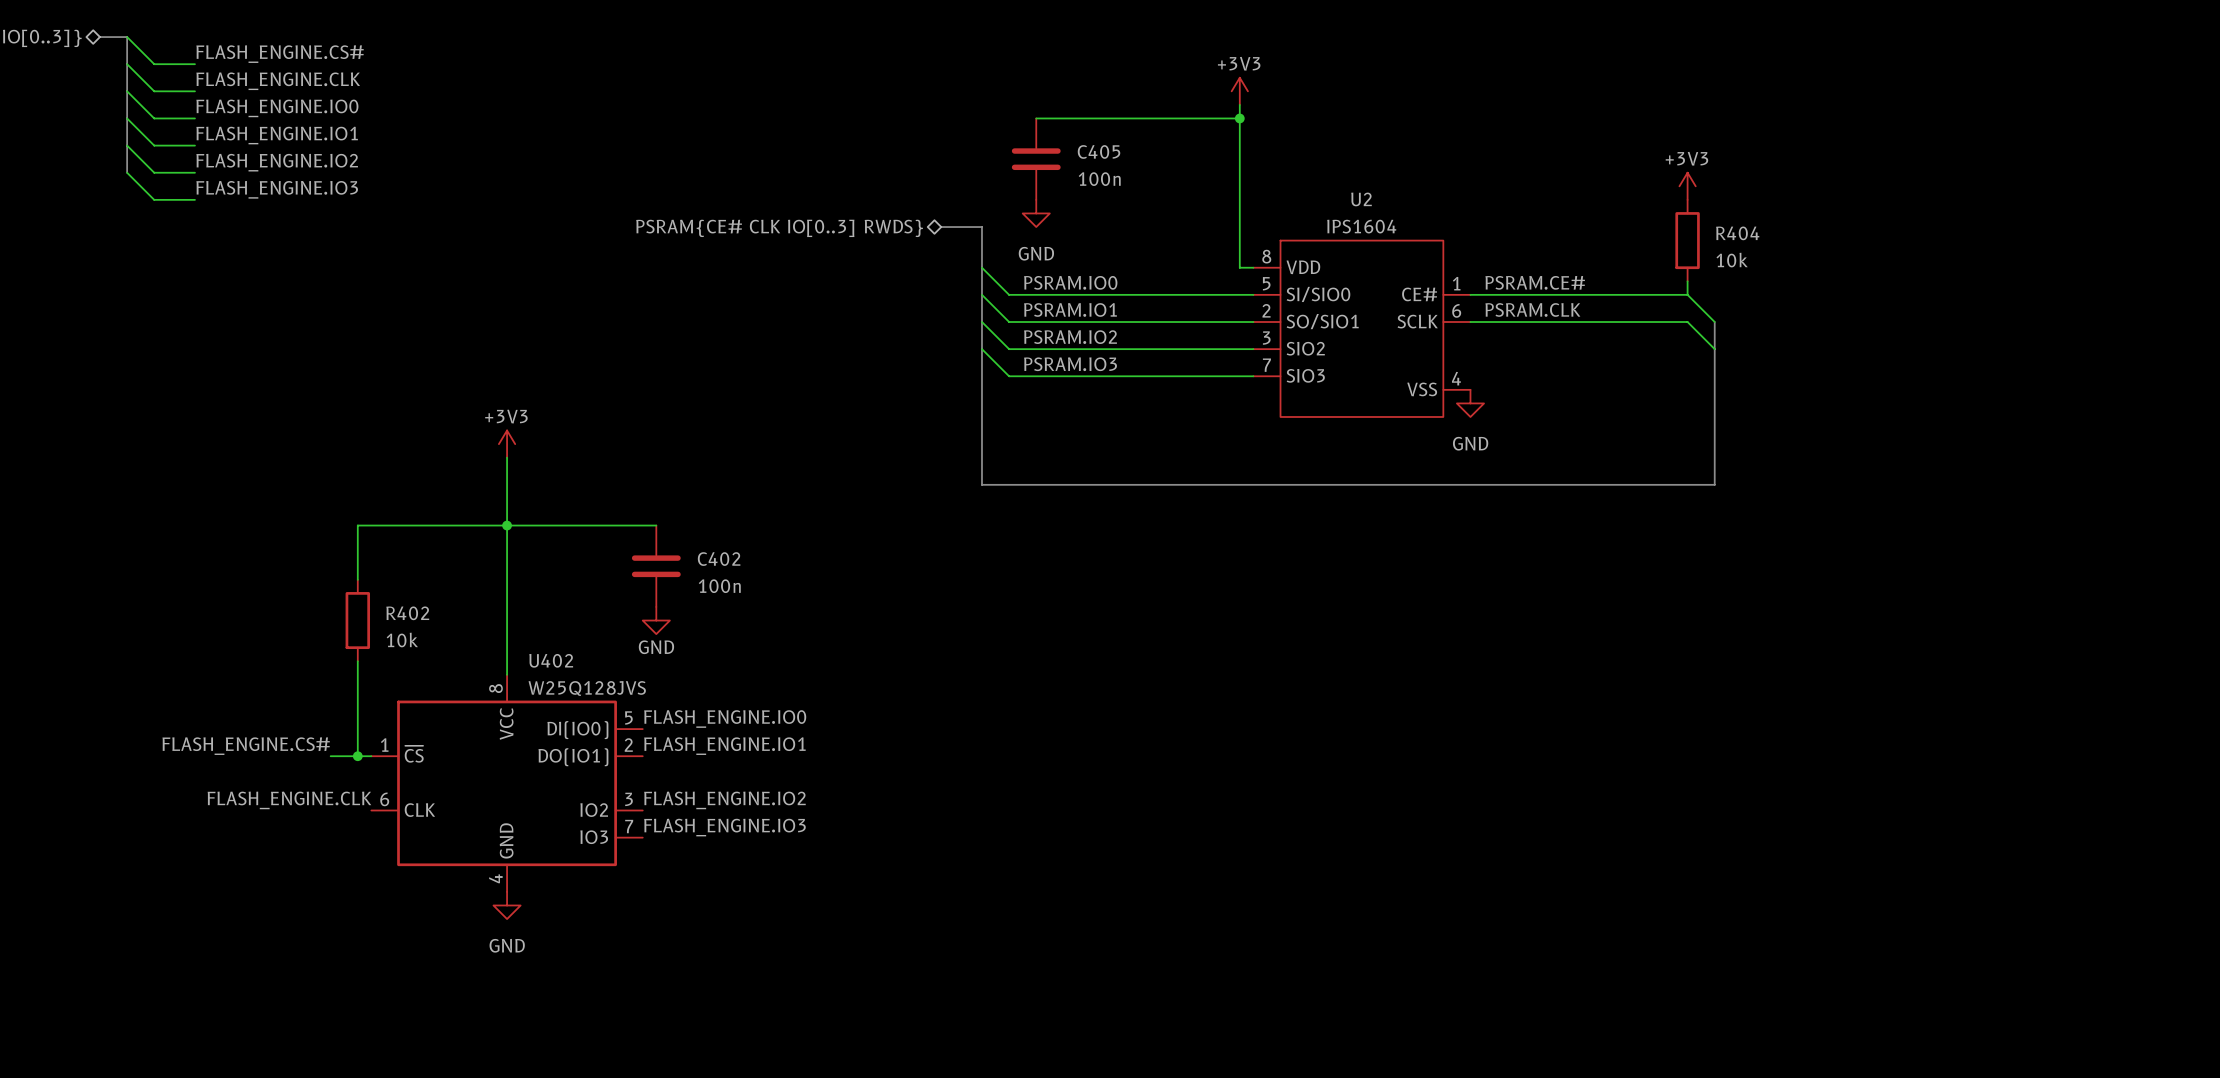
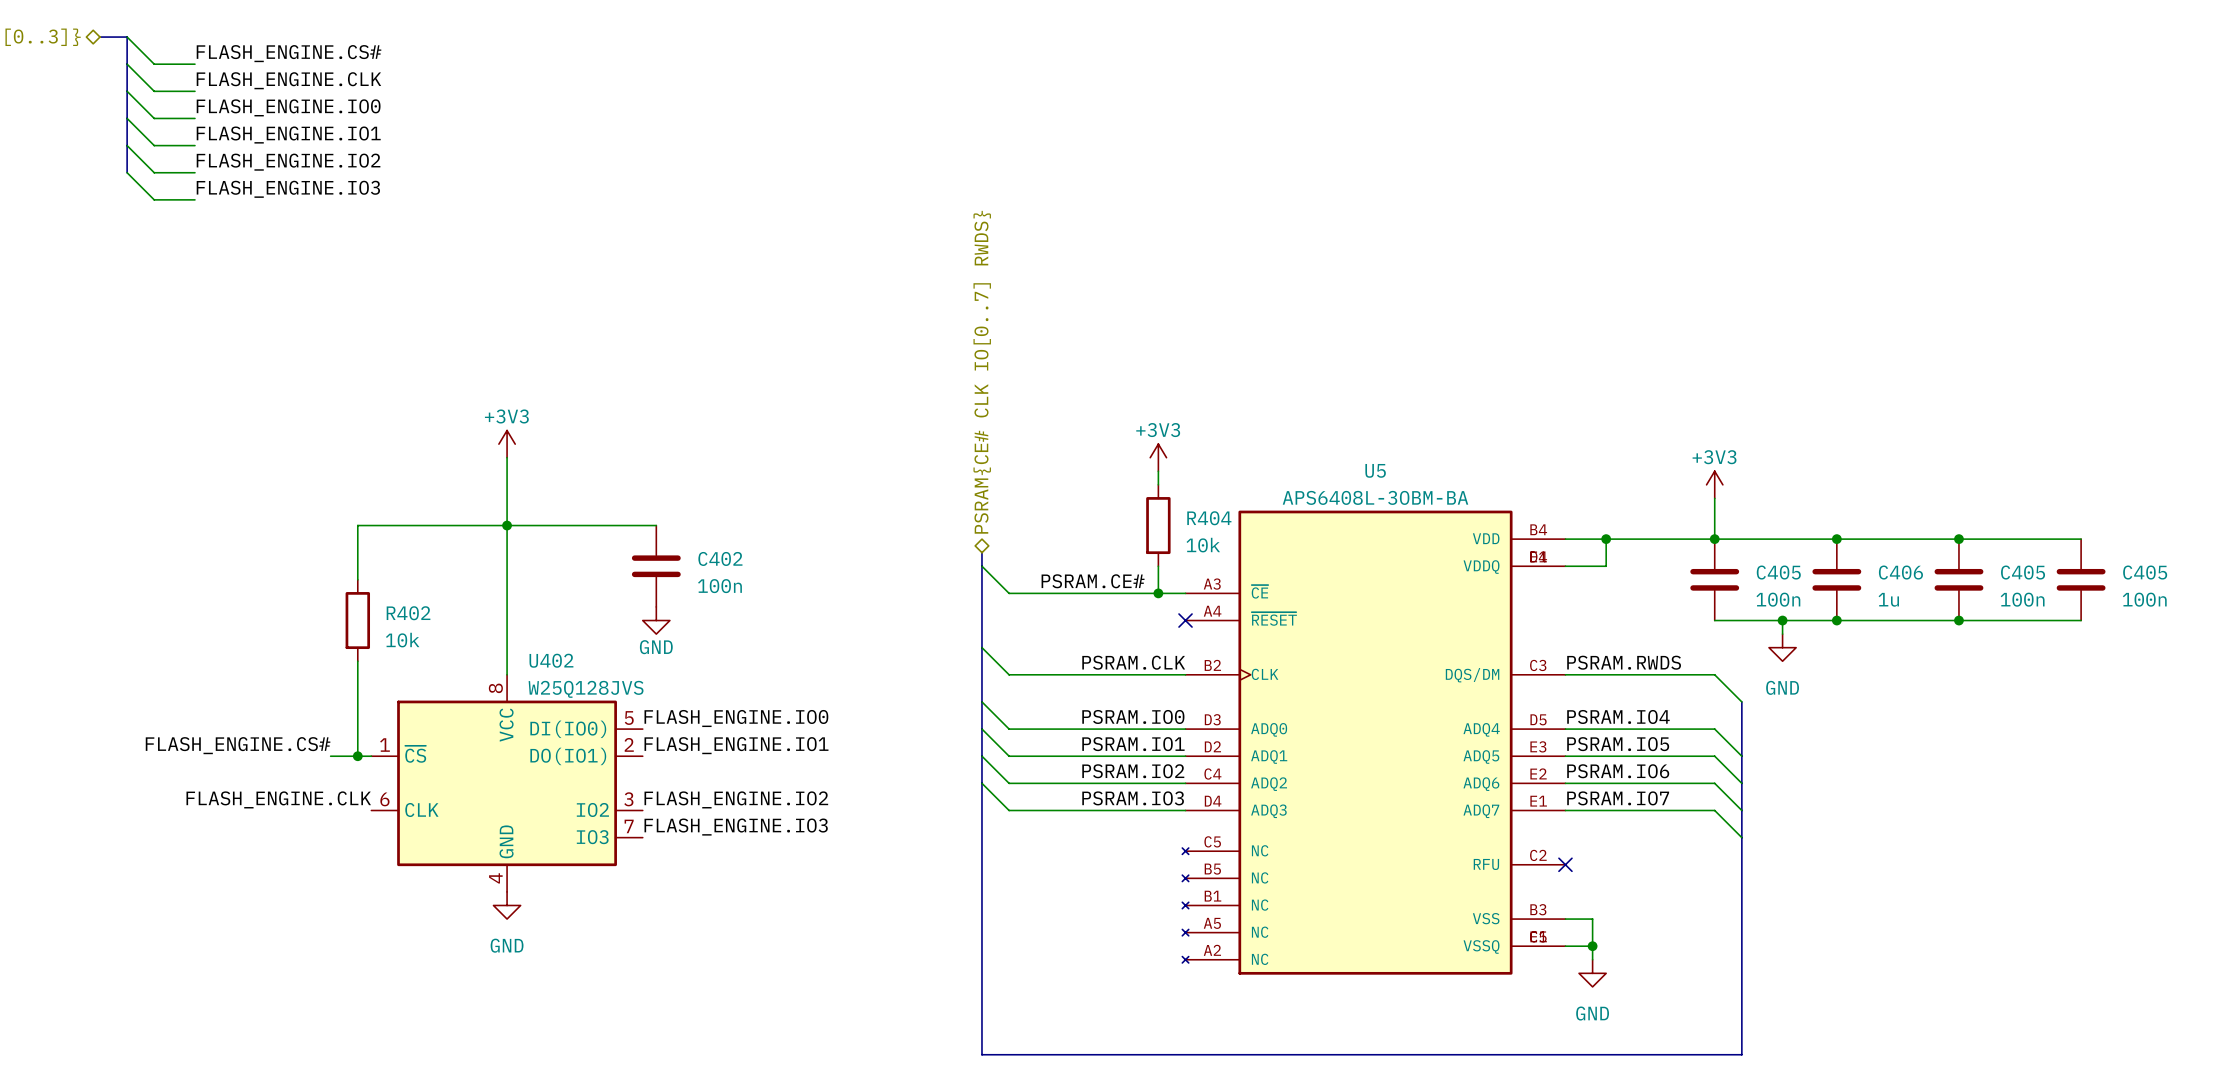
power symbol: +3V3 (1239, 91) -> none
wire: (1239, 104) (1239, 267) (1253, 267) -> none
wire: (1036, 118) (1239, 118) -> none
junction: (1239, 118) -> none
C405: 100n (1036, 159) -> none
power symbol: +3V3 (1687, 186) -> none
power symbol: GND (1036, 213) -> none
bus: (941, 227) (981, 227) (981, 484) (1714, 484) (1714, 322) -> none
hierarchical label: PSRAM{CE# CLK IO[0..3] RWDS} (779, 228) -> none
R404 position: (1687, 240) -> (1158, 525)
wire: (981, 267) (1009, 294) (1253, 294) -> none
wire: (1687, 281) (1687, 294) -> none
label: PSRAM.IO0 (1070, 282) -> none
label: PSRAM.CE# (1535, 282) -> none
wire: (981, 294) (1009, 322) (1253, 322) -> none
wire: (1470, 294) (1687, 294) -> none
wire: (1687, 294) (1714, 322) -> none
label: PSRAM.IO1 (1070, 309) -> none
label: PSRAM.CLK (1532, 309) -> none
wire: (981, 322) (1009, 349) (1253, 349) -> none
wire: (1470, 322) (1687, 322) (1714, 349) -> none
U2: IPS1604 (1361, 328) -> none
label: PSRAM.IO2 (1070, 337) -> none
wire: (981, 349) (1009, 376) (1253, 376) -> none
label: PSRAM.IO3 (1070, 364) -> none
hierarchical label: none -> PSRAM{CE# CLK IO[0..7] RWDS} (982, 372)
power symbol: GND (1470, 403) -> none
power symbol: none -> +3V3 (1158, 457)
wire: none -> (1158, 471) (1158, 484)
power symbol: none -> +3V3 (1714, 484)
wire: none -> (1714, 498) (1714, 539)
wire: none -> (1565, 539) (2081, 539)
wire: none -> (1606, 539) (1606, 566) (1565, 566)
junction: none -> (1606, 539)
junction: none -> (1714, 539)
junction: none -> (1836, 539)
junction: none -> (1958, 539)
bus: none -> (981, 552) (981, 1054) (1741, 1054) (1741, 701)
wire: none -> (981, 566) (1009, 593) (1185, 593)
wire: none -> (1158, 566) (1158, 593)
C405: none -> 100n (1714, 579)
C406: none -> 1u (1836, 579)
C405: none -> 100n (1958, 579)
C405: none -> 100n (2081, 579)
label: none -> PSRAM.CE# (1093, 581)
junction: none -> (1158, 593)
no-connect mark: none -> (1185, 620)
wire: none -> (1714, 620) (2081, 620)
wire: none -> (1782, 620) (1782, 634)
junction: none -> (1782, 620)
junction: none -> (1836, 620)
junction: none -> (1958, 620)
wire: none -> (981, 647) (1009, 674) (1185, 674)
power symbol: none -> GND (1782, 647)
label: none -> PSRAM.CLK (1133, 662)
label: none -> PSRAM.RWDS (1624, 662)
wire: none -> (1565, 674) (1714, 674) (1741, 701)
wire: none -> (981, 701) (1009, 729) (1185, 729)
label: none -> PSRAM.IO0 (1133, 716)
label: none -> PSRAM.IO4 (1618, 716)
wire: none -> (981, 729) (1009, 756) (1185, 756)
wire: none -> (1565, 729) (1714, 729) (1741, 756)
U5: none -> APS6408L-3OBM-BA (1373, 742)
label: none -> PSRAM.IO1 (1133, 744)
label: none -> PSRAM.IO5 (1618, 744)
wire: none -> (981, 756) (1009, 783) (1185, 783)
wire: none -> (1565, 756) (1714, 756) (1741, 783)
label: none -> PSRAM.IO2 (1133, 771)
label: none -> PSRAM.IO6 (1618, 771)
wire: none -> (981, 783) (1009, 810) (1185, 810)
wire: none -> (1565, 783) (1714, 783) (1741, 810)
label: none -> PSRAM.IO3 (1133, 798)
label: none -> PSRAM.IO7 (1618, 798)
wire: none -> (1565, 810) (1714, 810) (1741, 837)
no-connect mark: none -> (1565, 864)
wire: none -> (1565, 919) (1592, 919) (1592, 959)
wire: none -> (1565, 946) (1592, 946)
junction: none -> (1592, 946)
power symbol: none -> GND (1592, 973)

